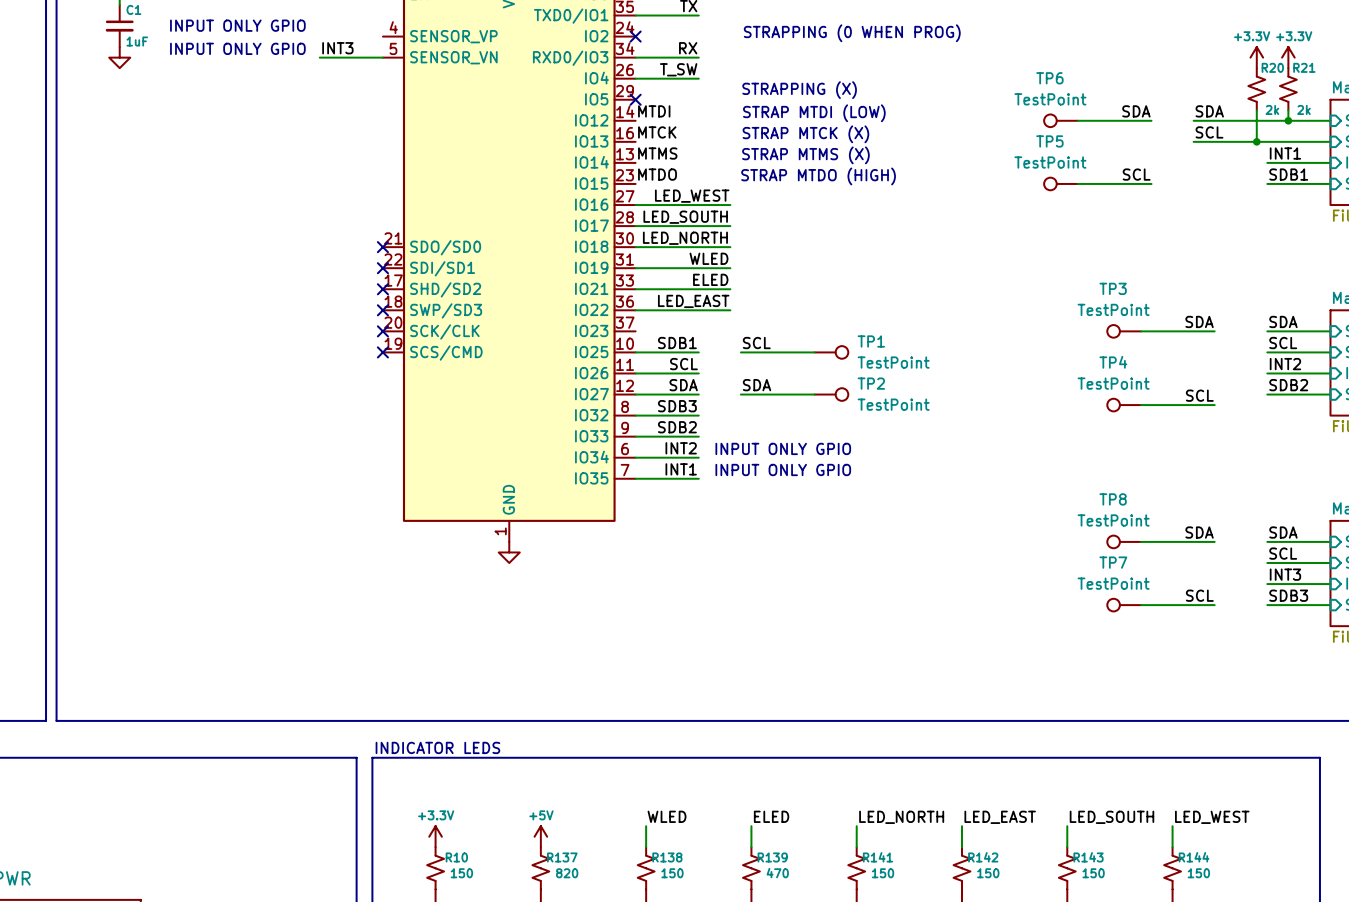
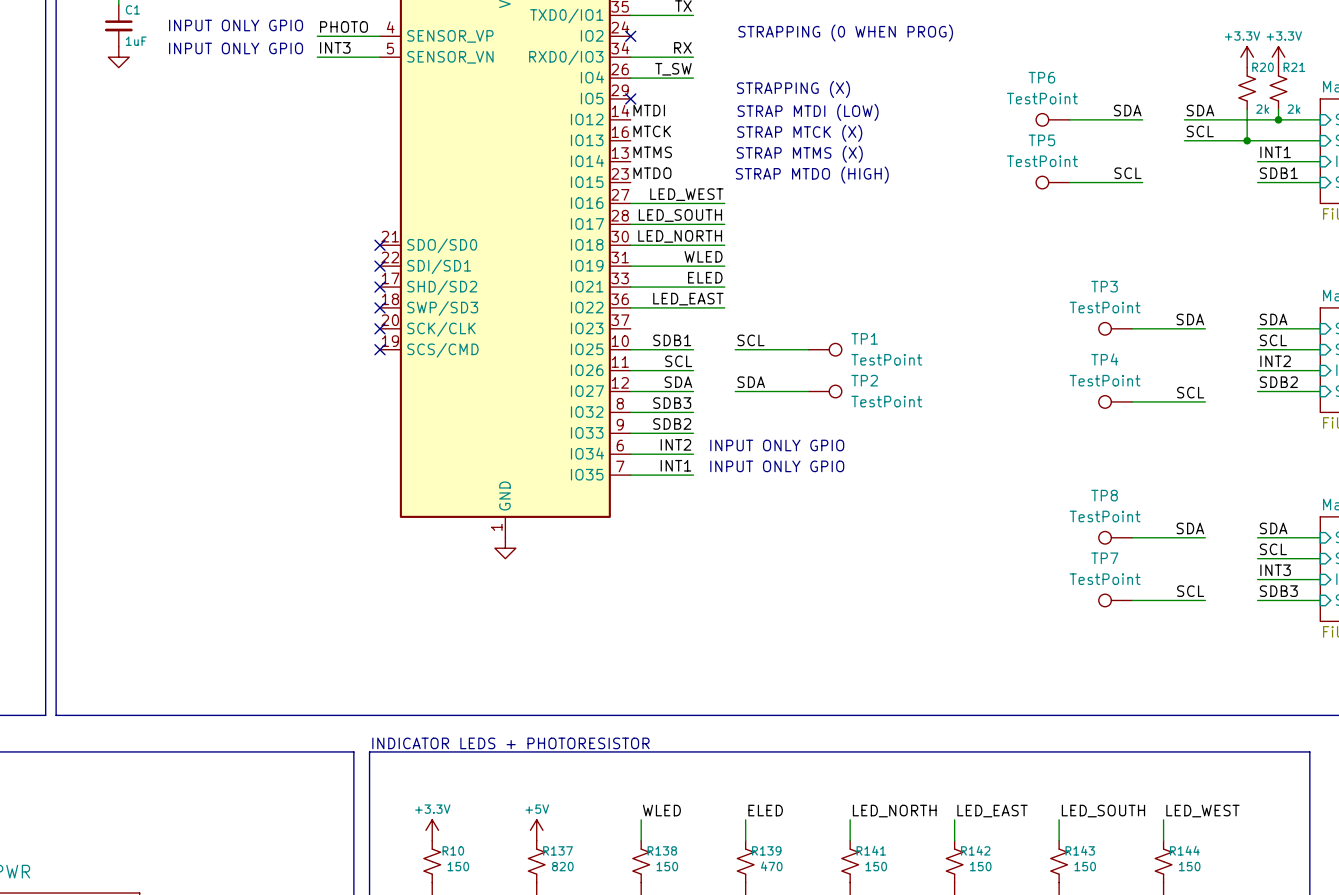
label: none -> PHOTO (344, 26)
wire: none -> (317, 36) (380, 36)
text: INDICATOR LEDS (437, 747) -> INDICATOR LEDS + PHOTORESISTOR (510, 743)

